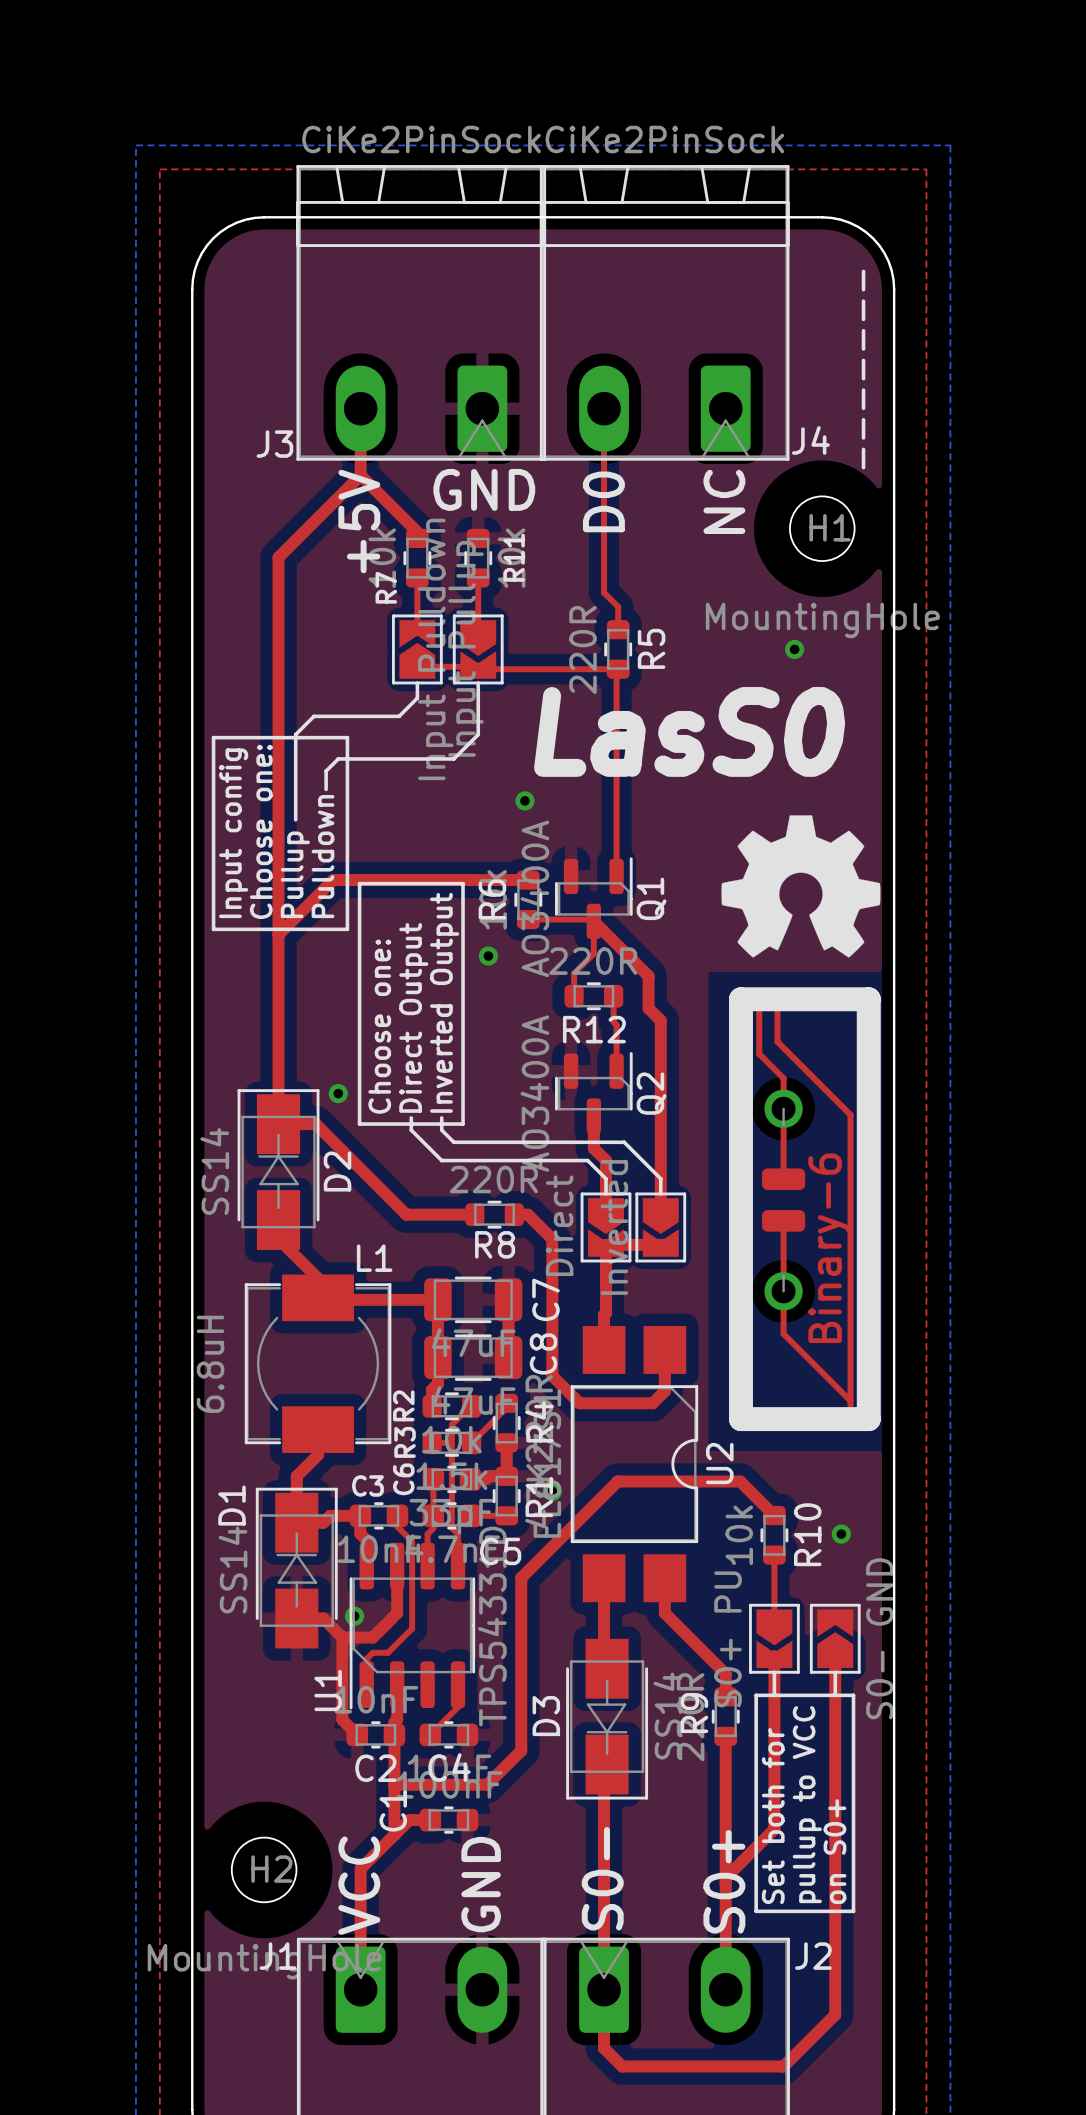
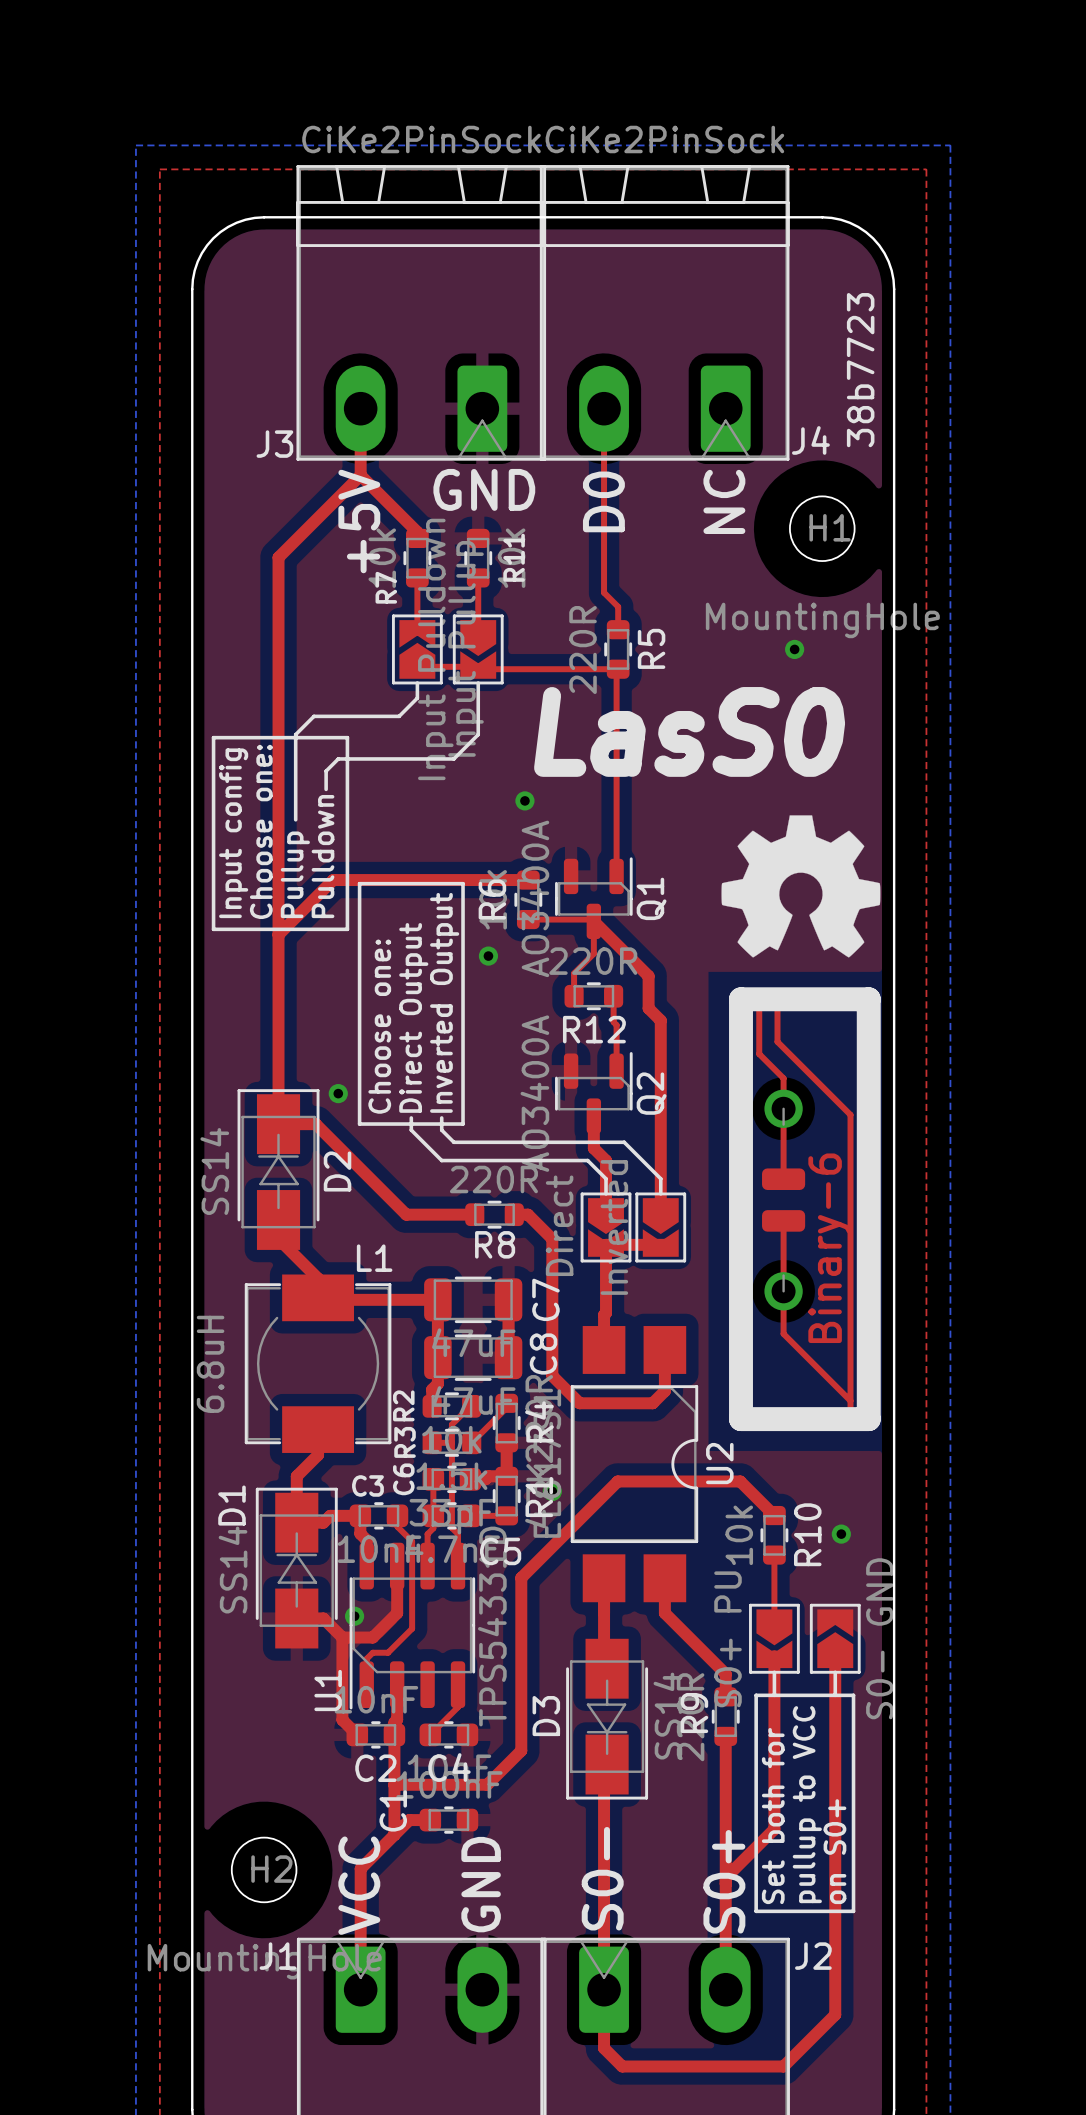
text: ------- (863, 369) -> 38b7723 (860, 370)

